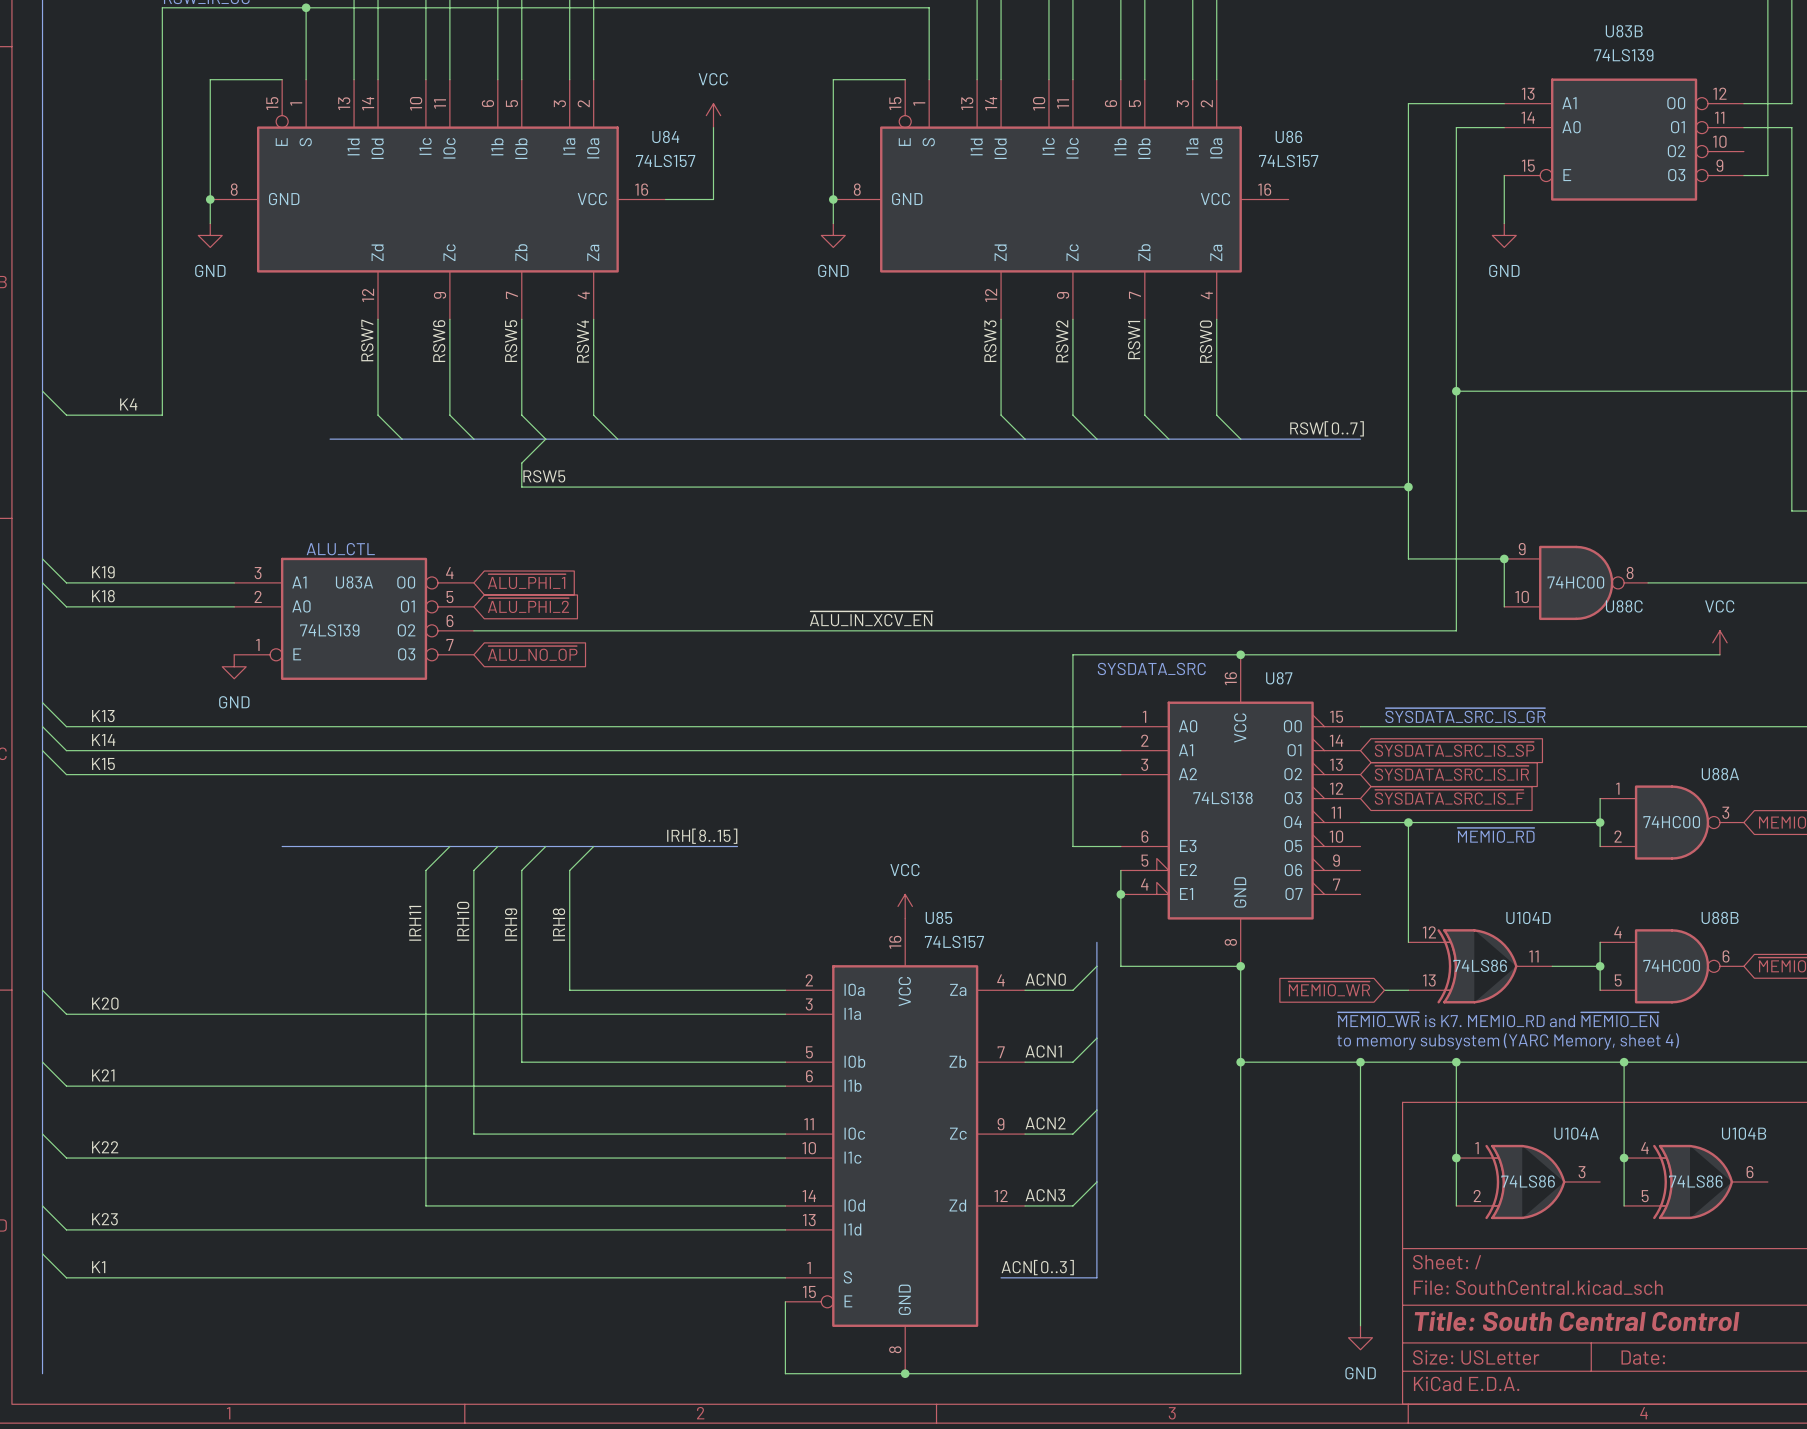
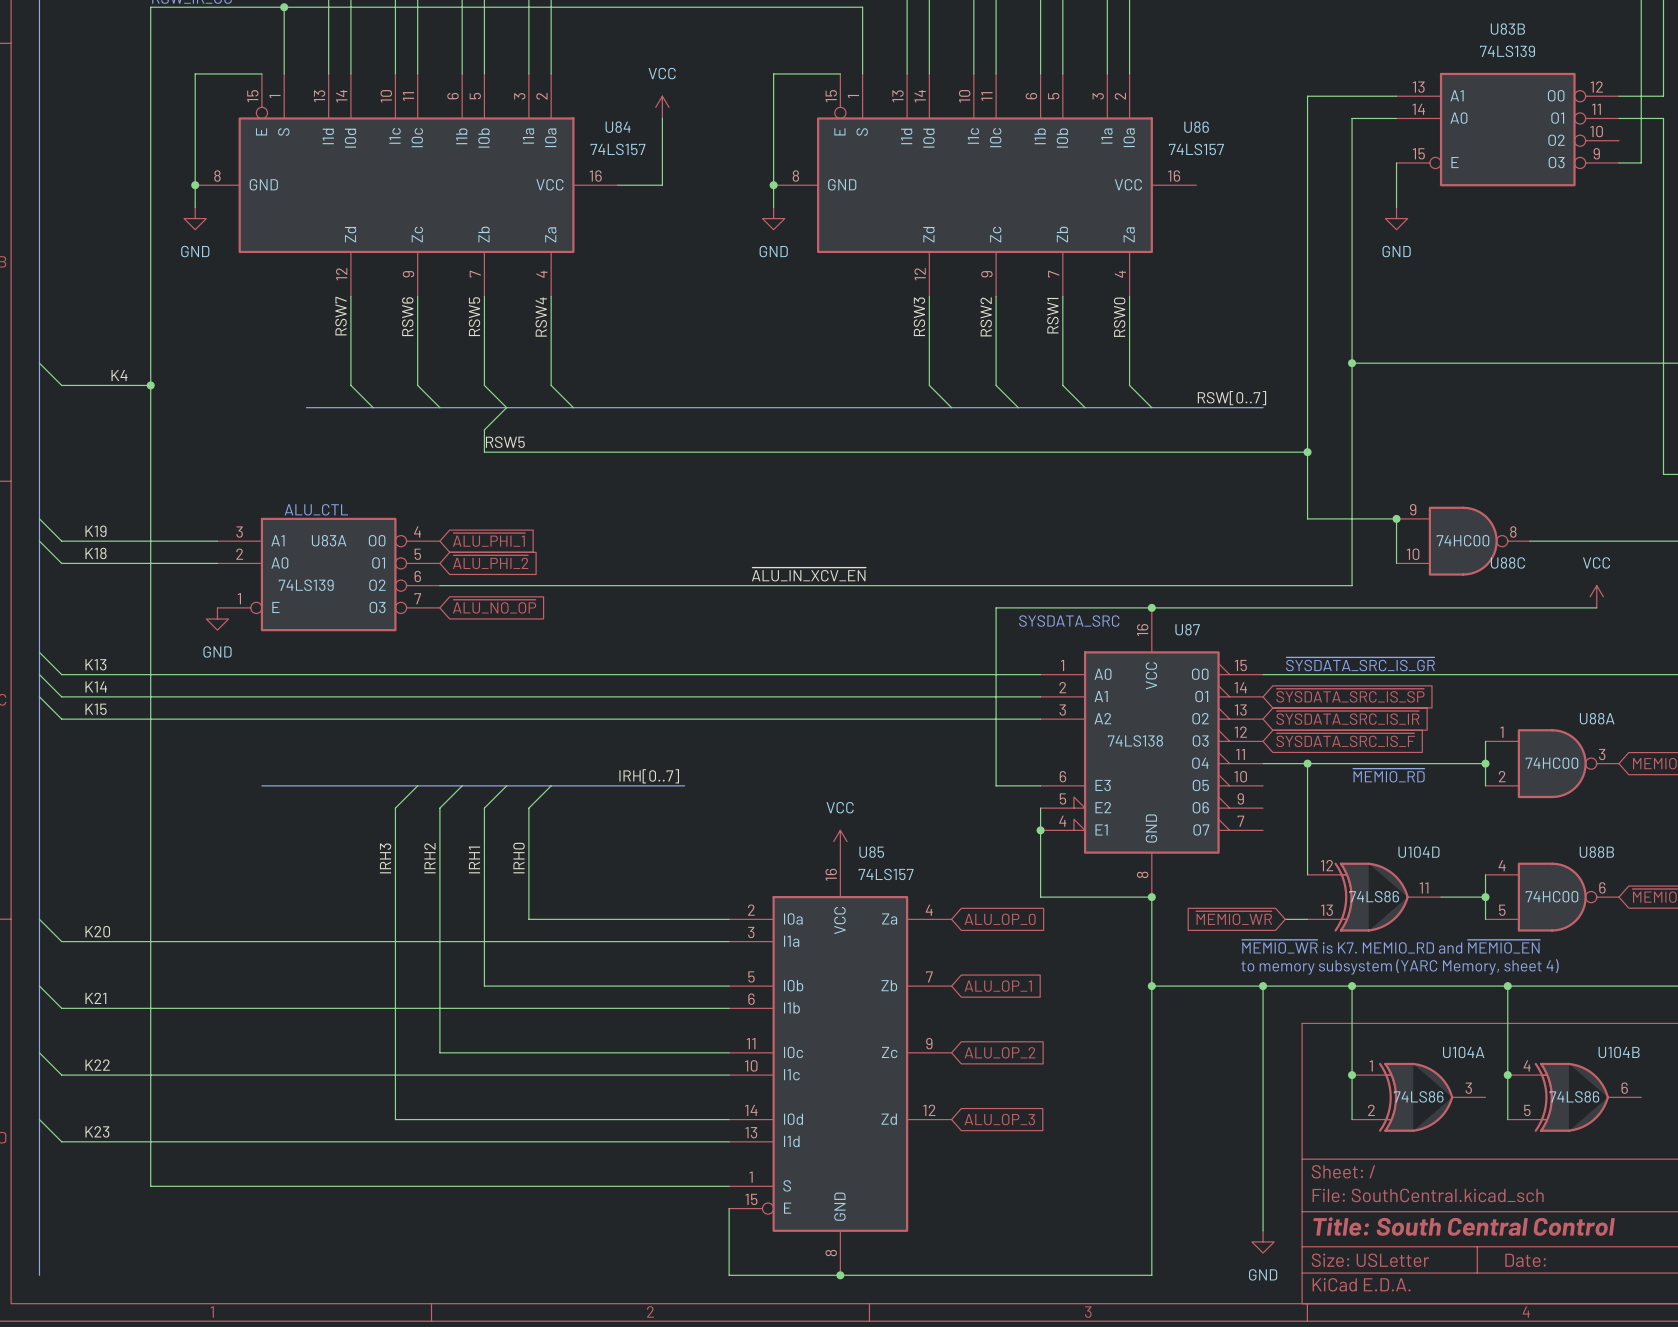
junction: none -> (150, 385)
label: IRH[8..15] (702, 836) -> IRH[0..7] (649, 776)
label: IRH10 (463, 921) -> IRH2 (429, 858)
label: IRH11 (415, 923) -> IRH3 (385, 858)
label: IRH9 (511, 924) -> IRH1 (474, 859)
label: IRH8 (559, 924) -> IRH0 (518, 858)
bus: (1096, 942) (1096, 1277) (1001, 1277) -> none
wire: (1096, 966) (1072, 990) (1025, 990) -> none
label: ACN0 (1045, 979) -> none
global label: none -> ALU_OP_0 (1000, 919)
wire: (1096, 1038) (1072, 1062) (1025, 1062) -> none
label: ACN1 (1043, 1051) -> none
global label: none -> ALU_OP_1 (998, 986)
wire: (1096, 1110) (1072, 1134) (1025, 1134) -> none
label: ACN2 (1045, 1123) -> none
global label: none -> ALU_OP_2 (999, 1052)
wire: (1096, 1181) (1072, 1205) (1025, 1205) -> none
label: ACN3 (1045, 1195) -> none
global label: none -> ALU_OP_3 (999, 1119)
wire: (42, 1253) (66, 1277) (162, 1277) -> (150, 385) (150, 1186)
label: K1 (98, 1267) -> none
label: ACN[0..3] (1037, 1267) -> none

